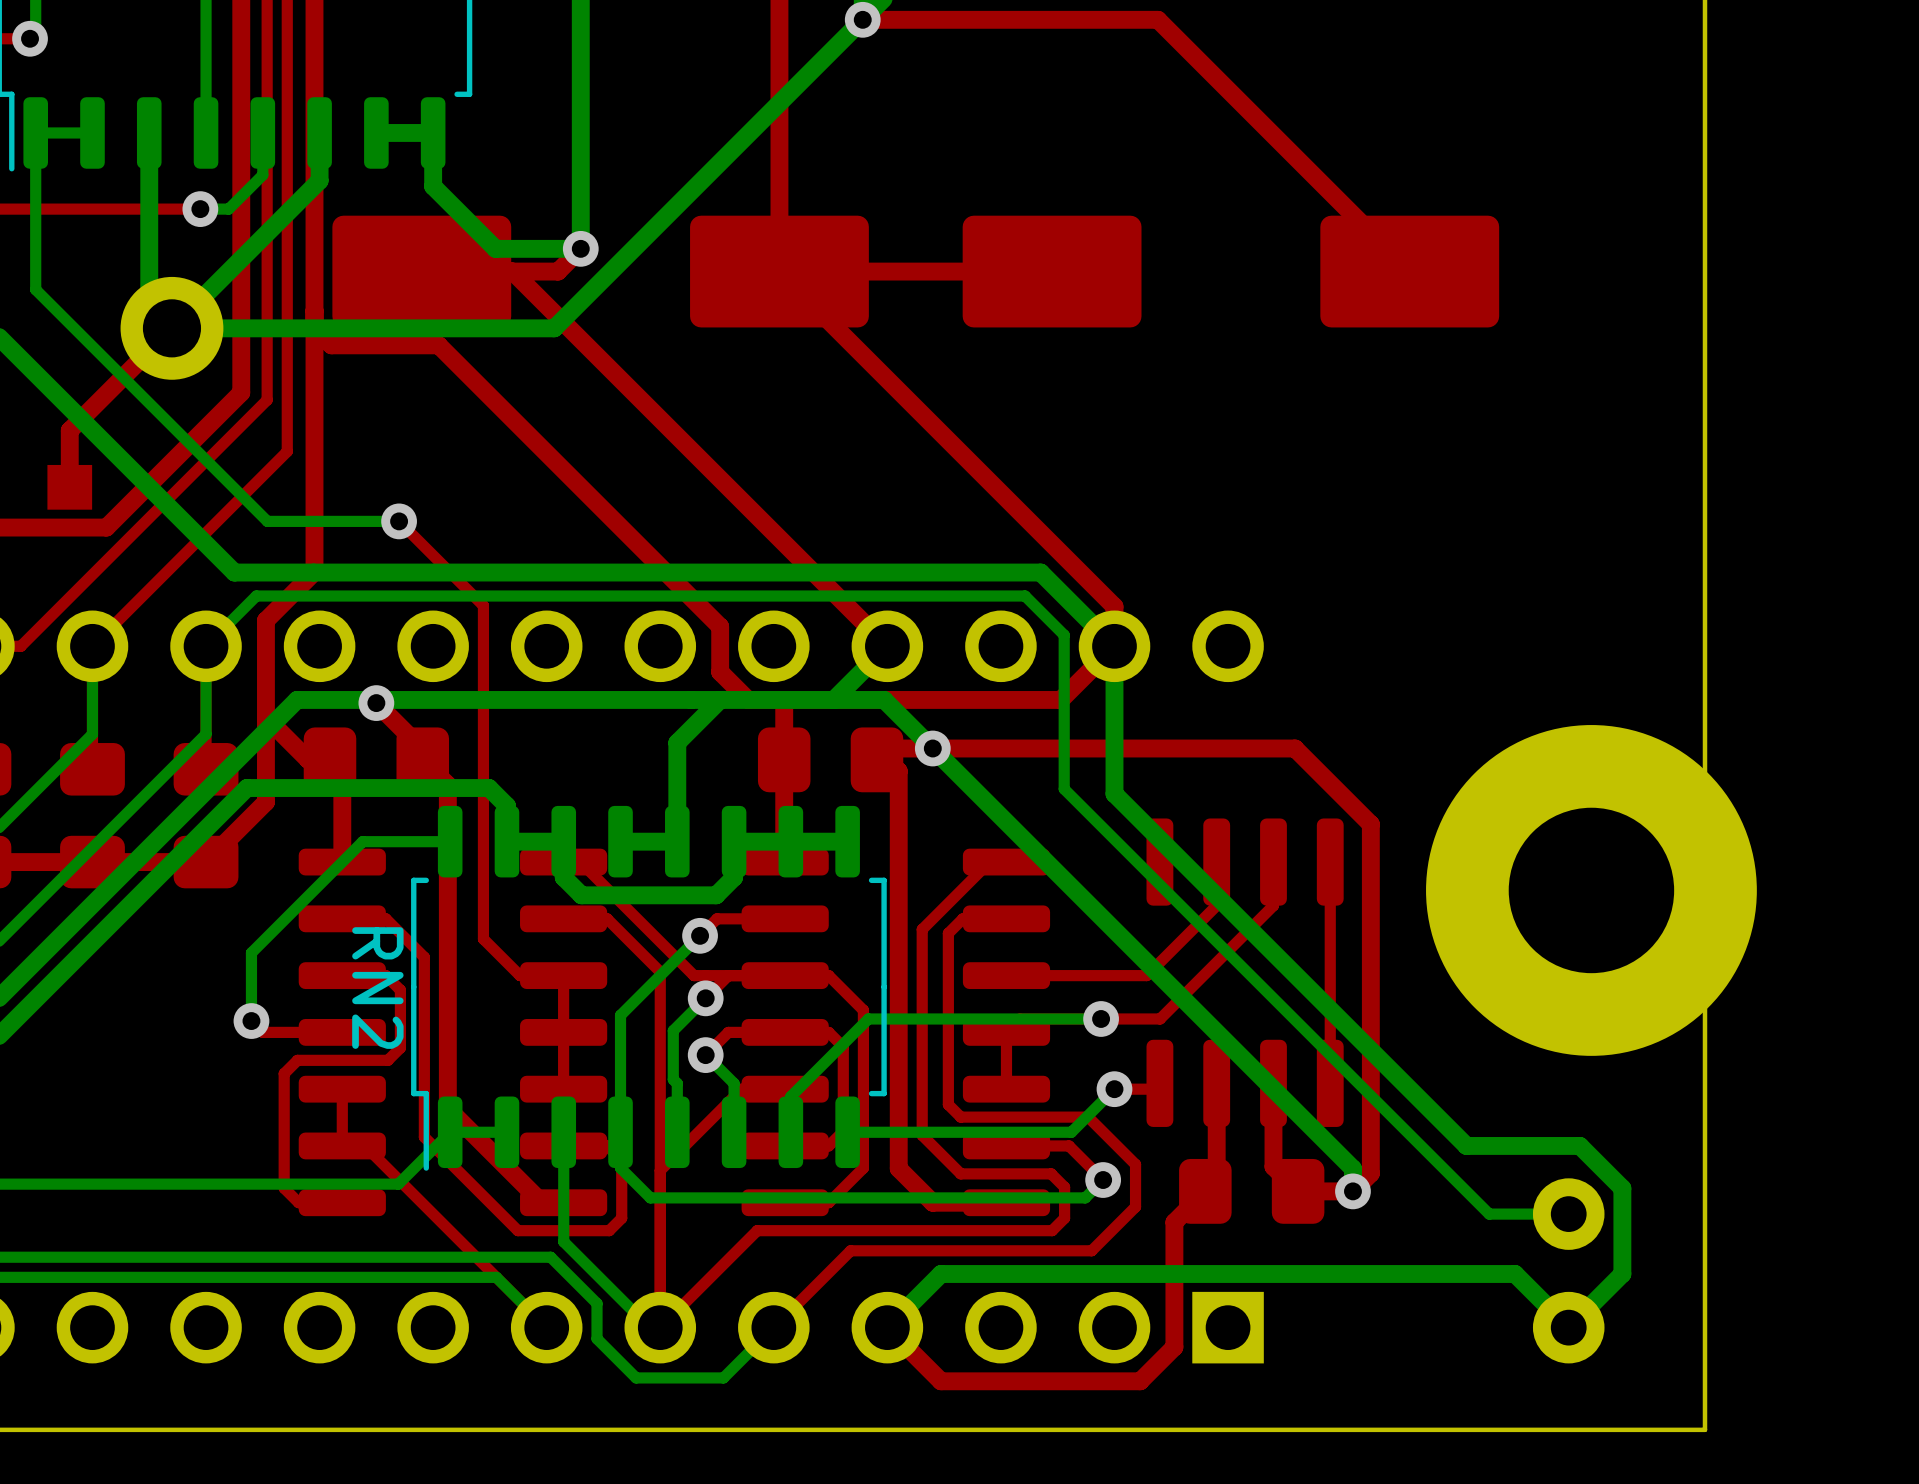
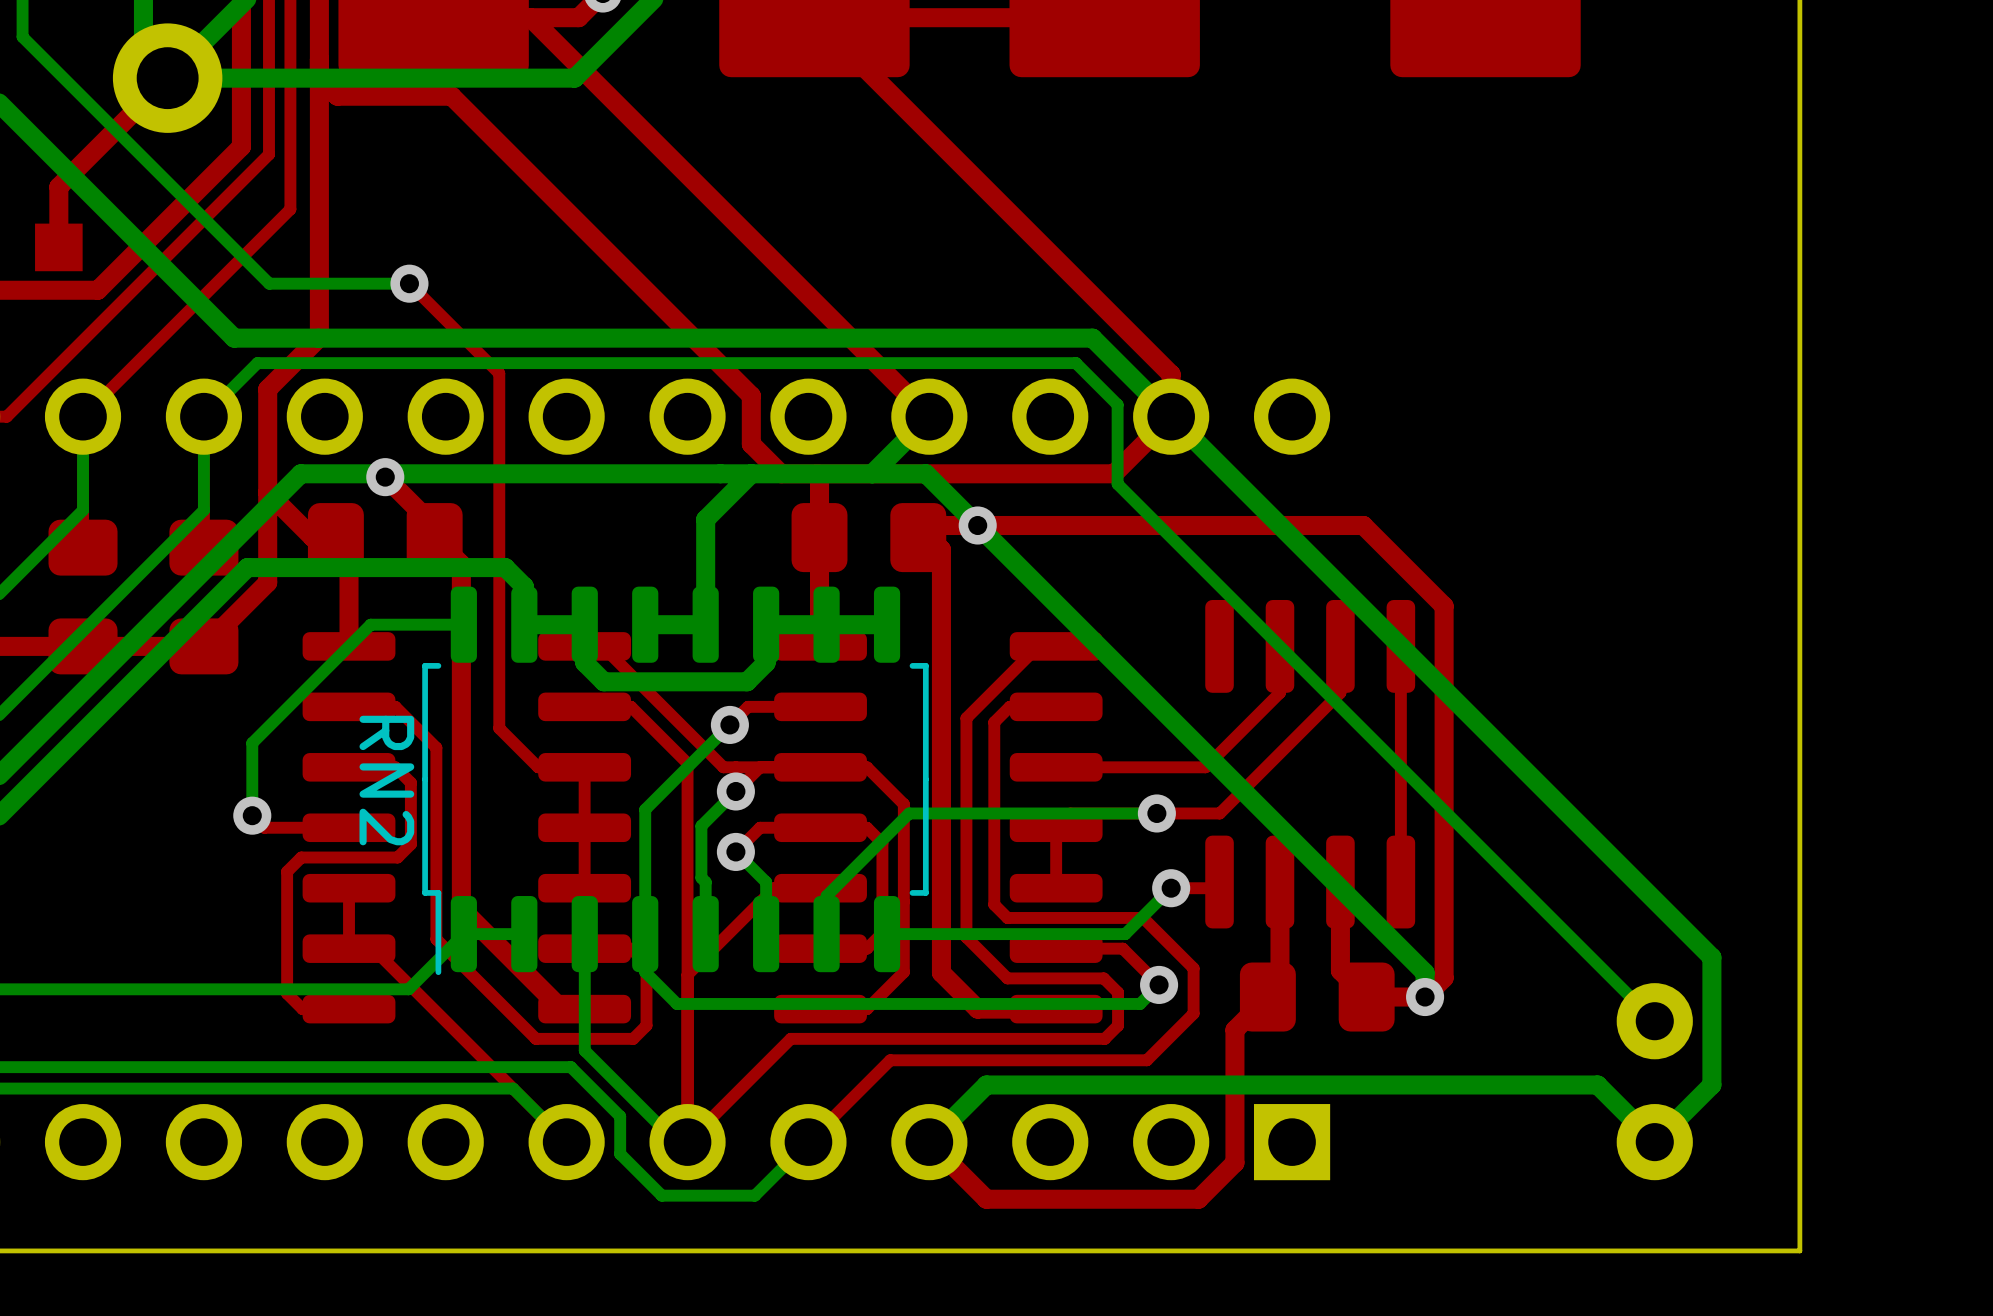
bottom track: (1114, 646) (1114, 793) (1466, 1145) (1579, 1145) (1622, 1188) -> (1171, 416) (1711, 957) (1711, 993)
bottom track: (1064, 709) (1064, 789) (1489, 1214) (1568, 1214) -> (1117, 484) (1654, 1021)
part: (1591, 890) -> none

